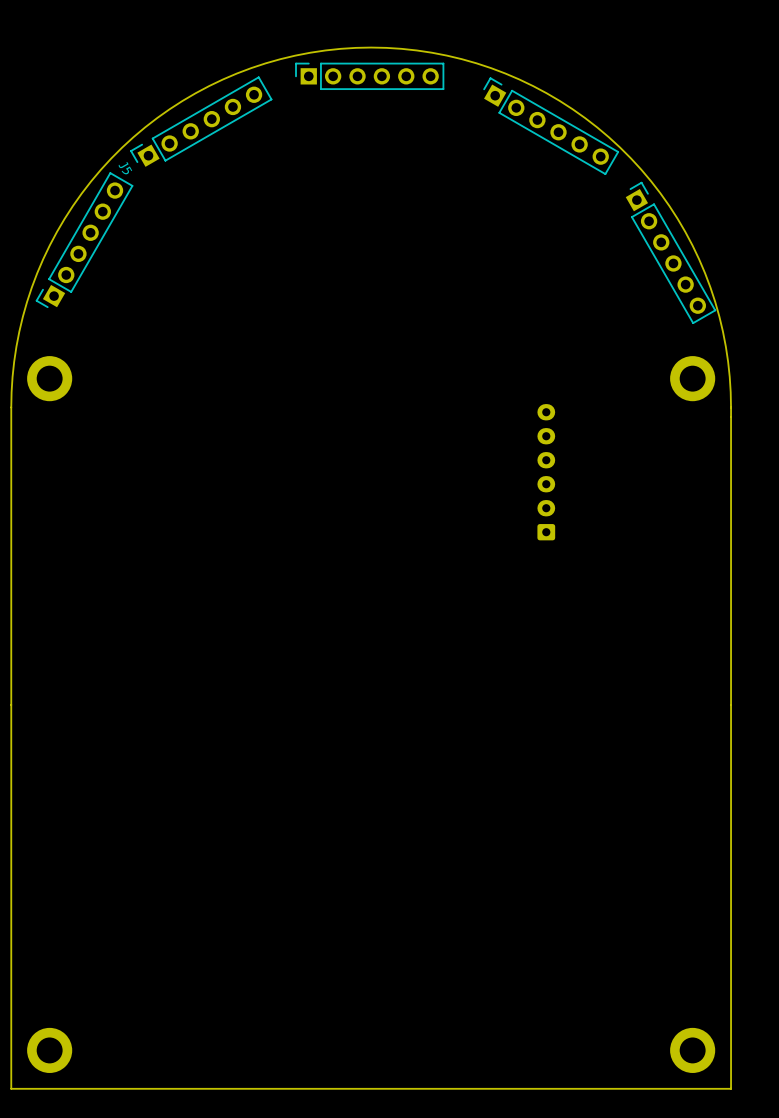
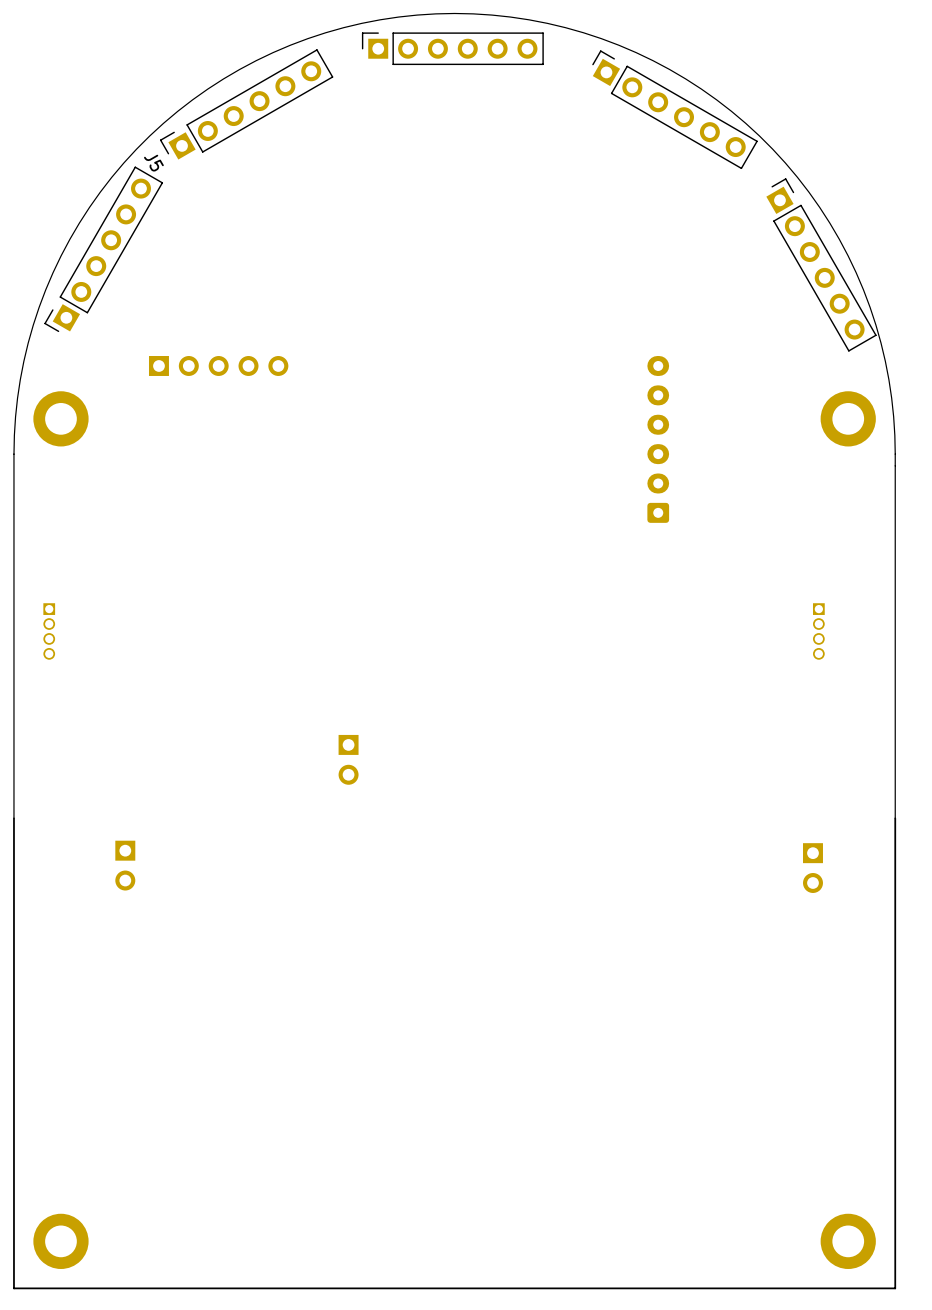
part: none -> (218, 365)
part position: (546, 472) -> (658, 439)
part: none -> (49, 631)
part: none -> (818, 631)
part: none -> (348, 759)
part: none -> (125, 865)
part: none -> (812, 868)

